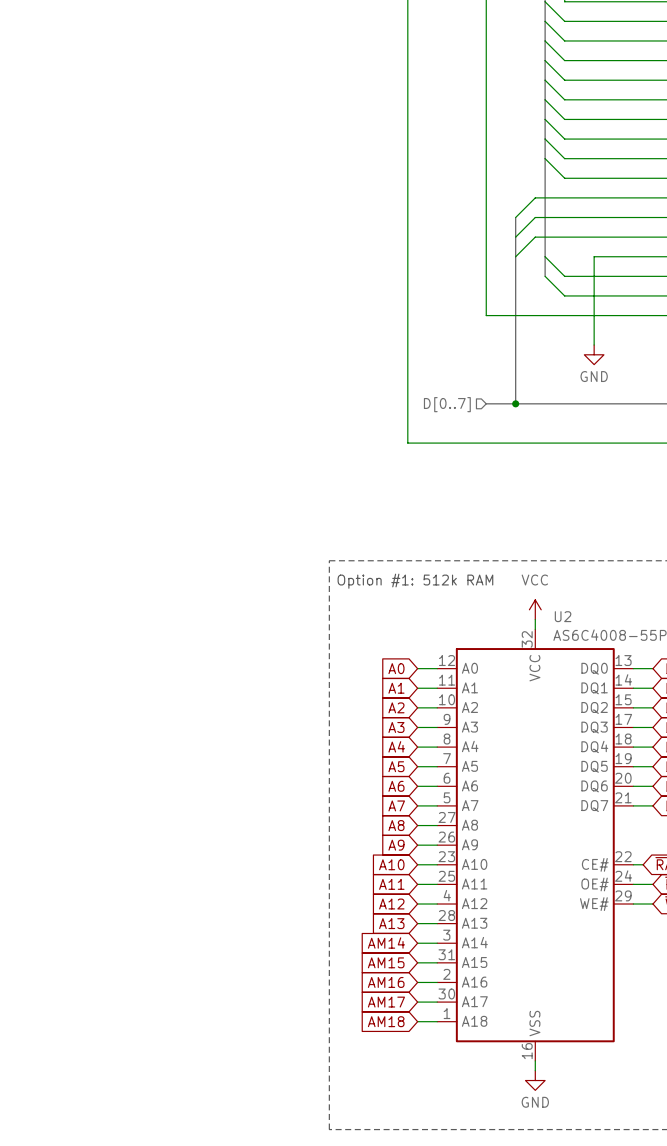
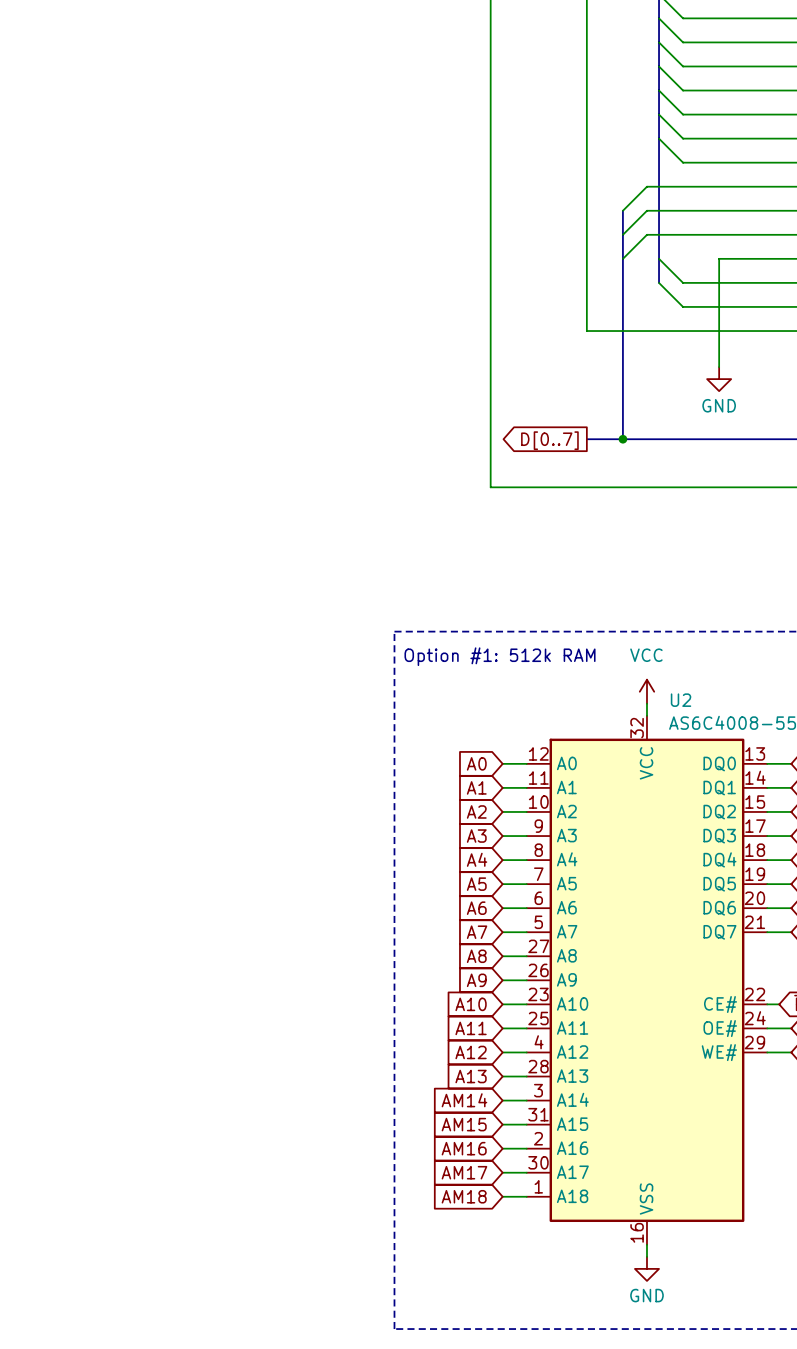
hierarchical label: D[0..7] (447, 404) -> none
global label: none -> D[0..7] (549, 440)

